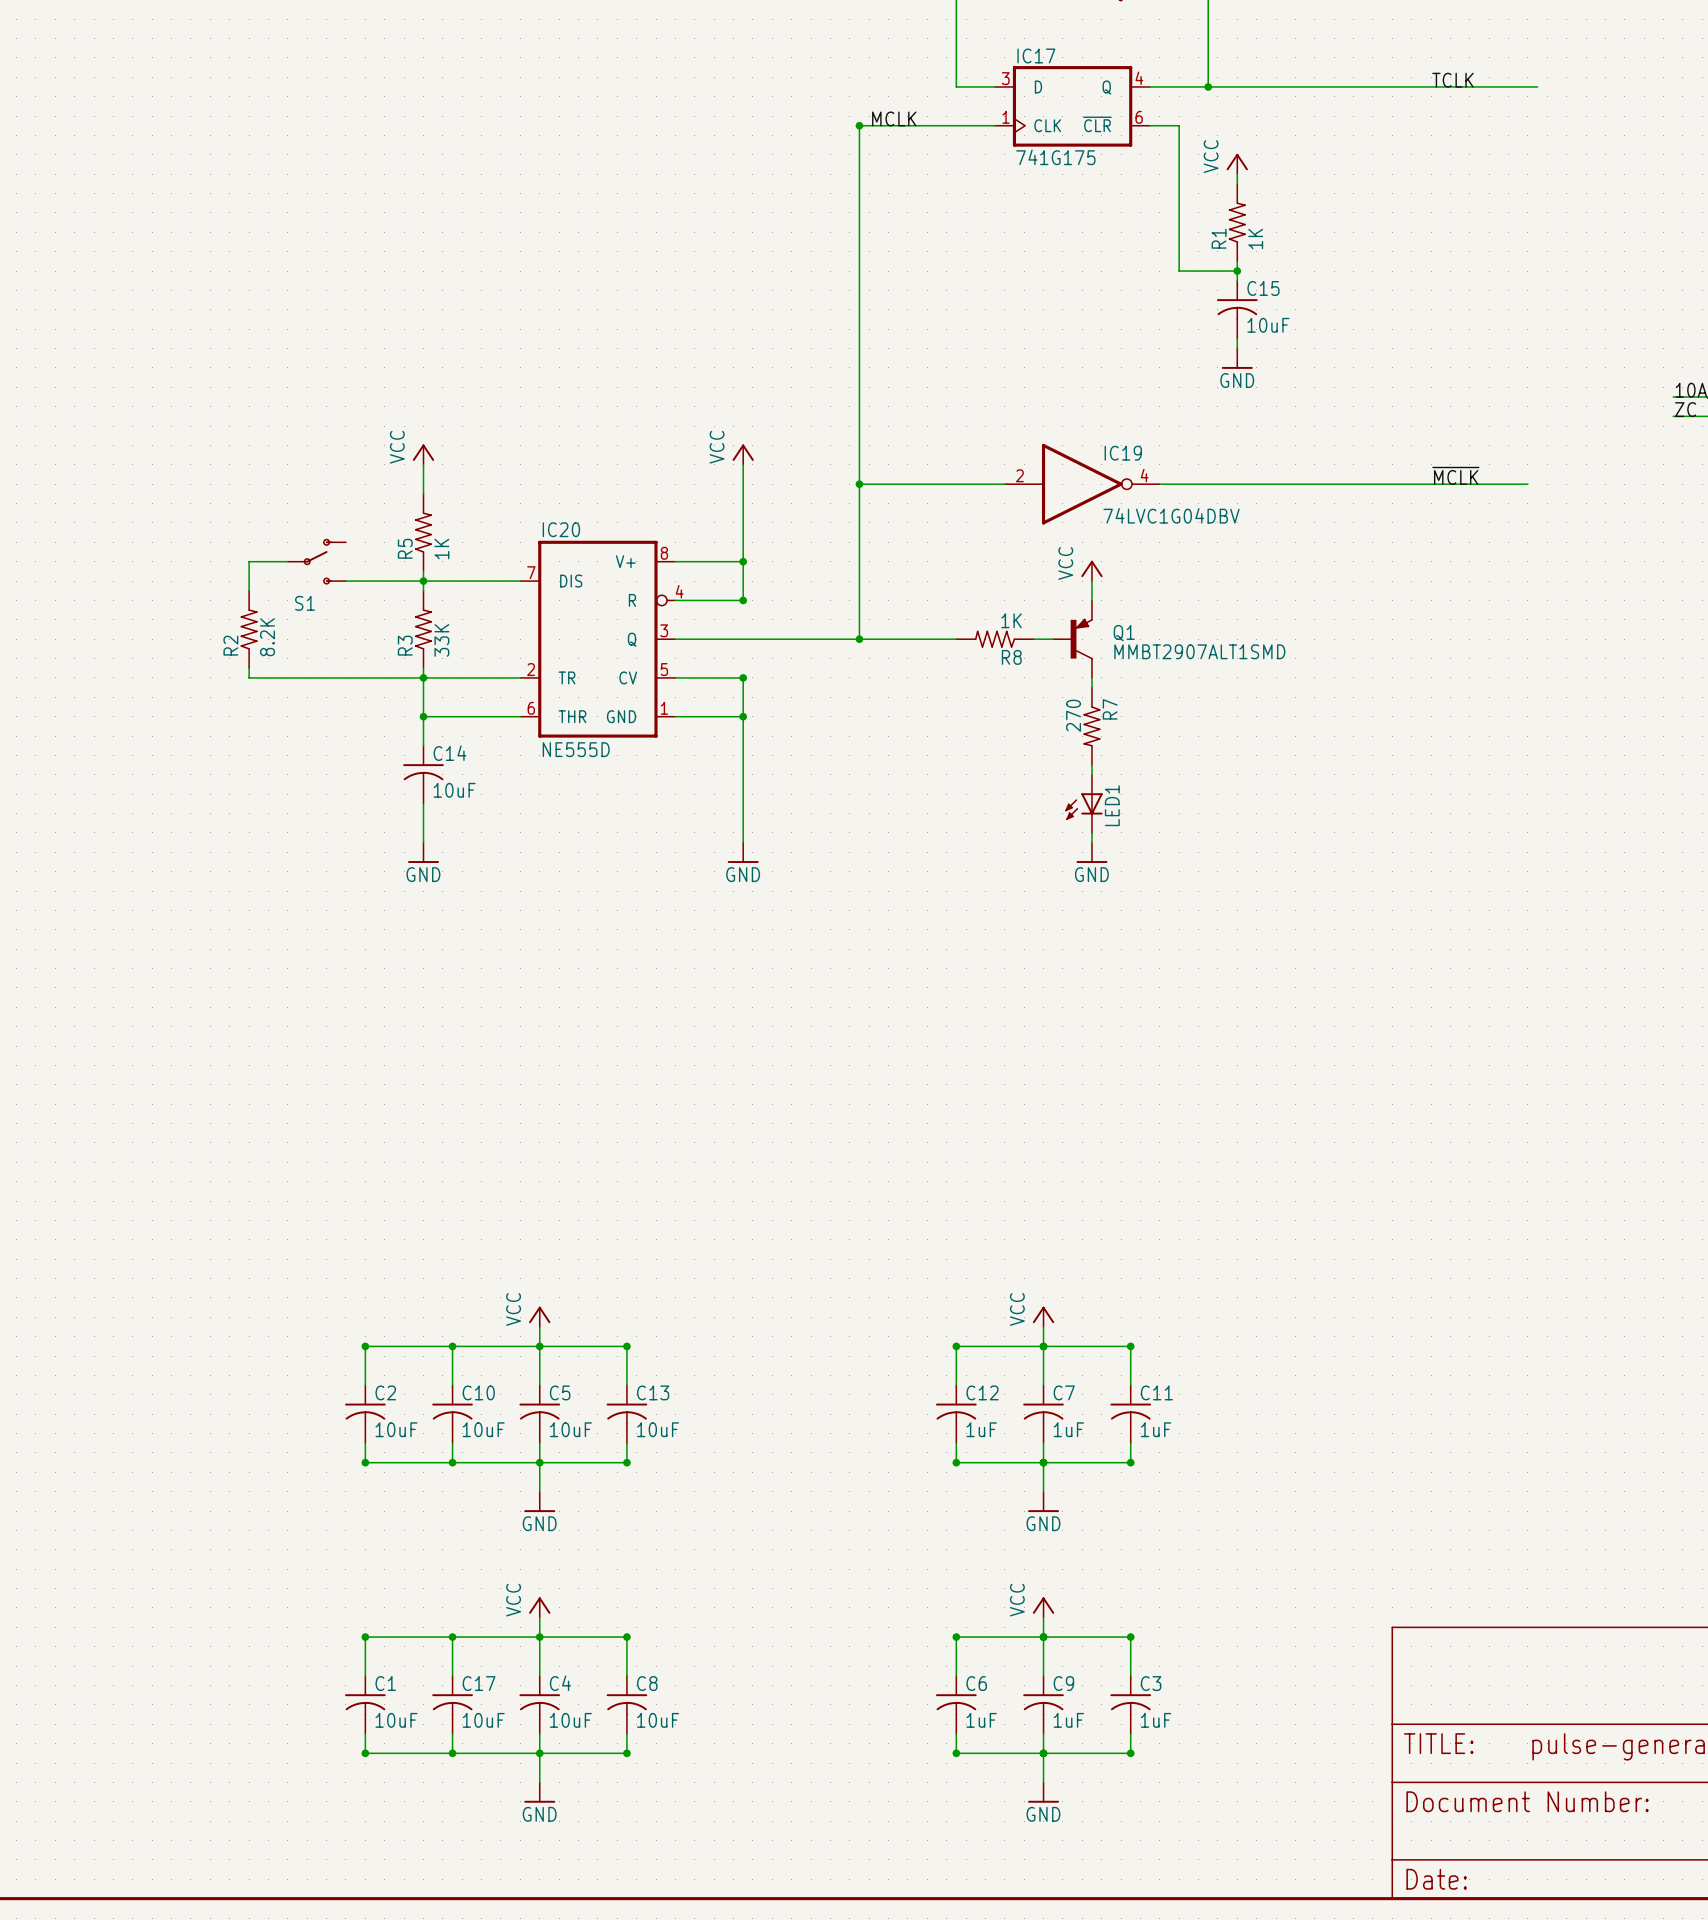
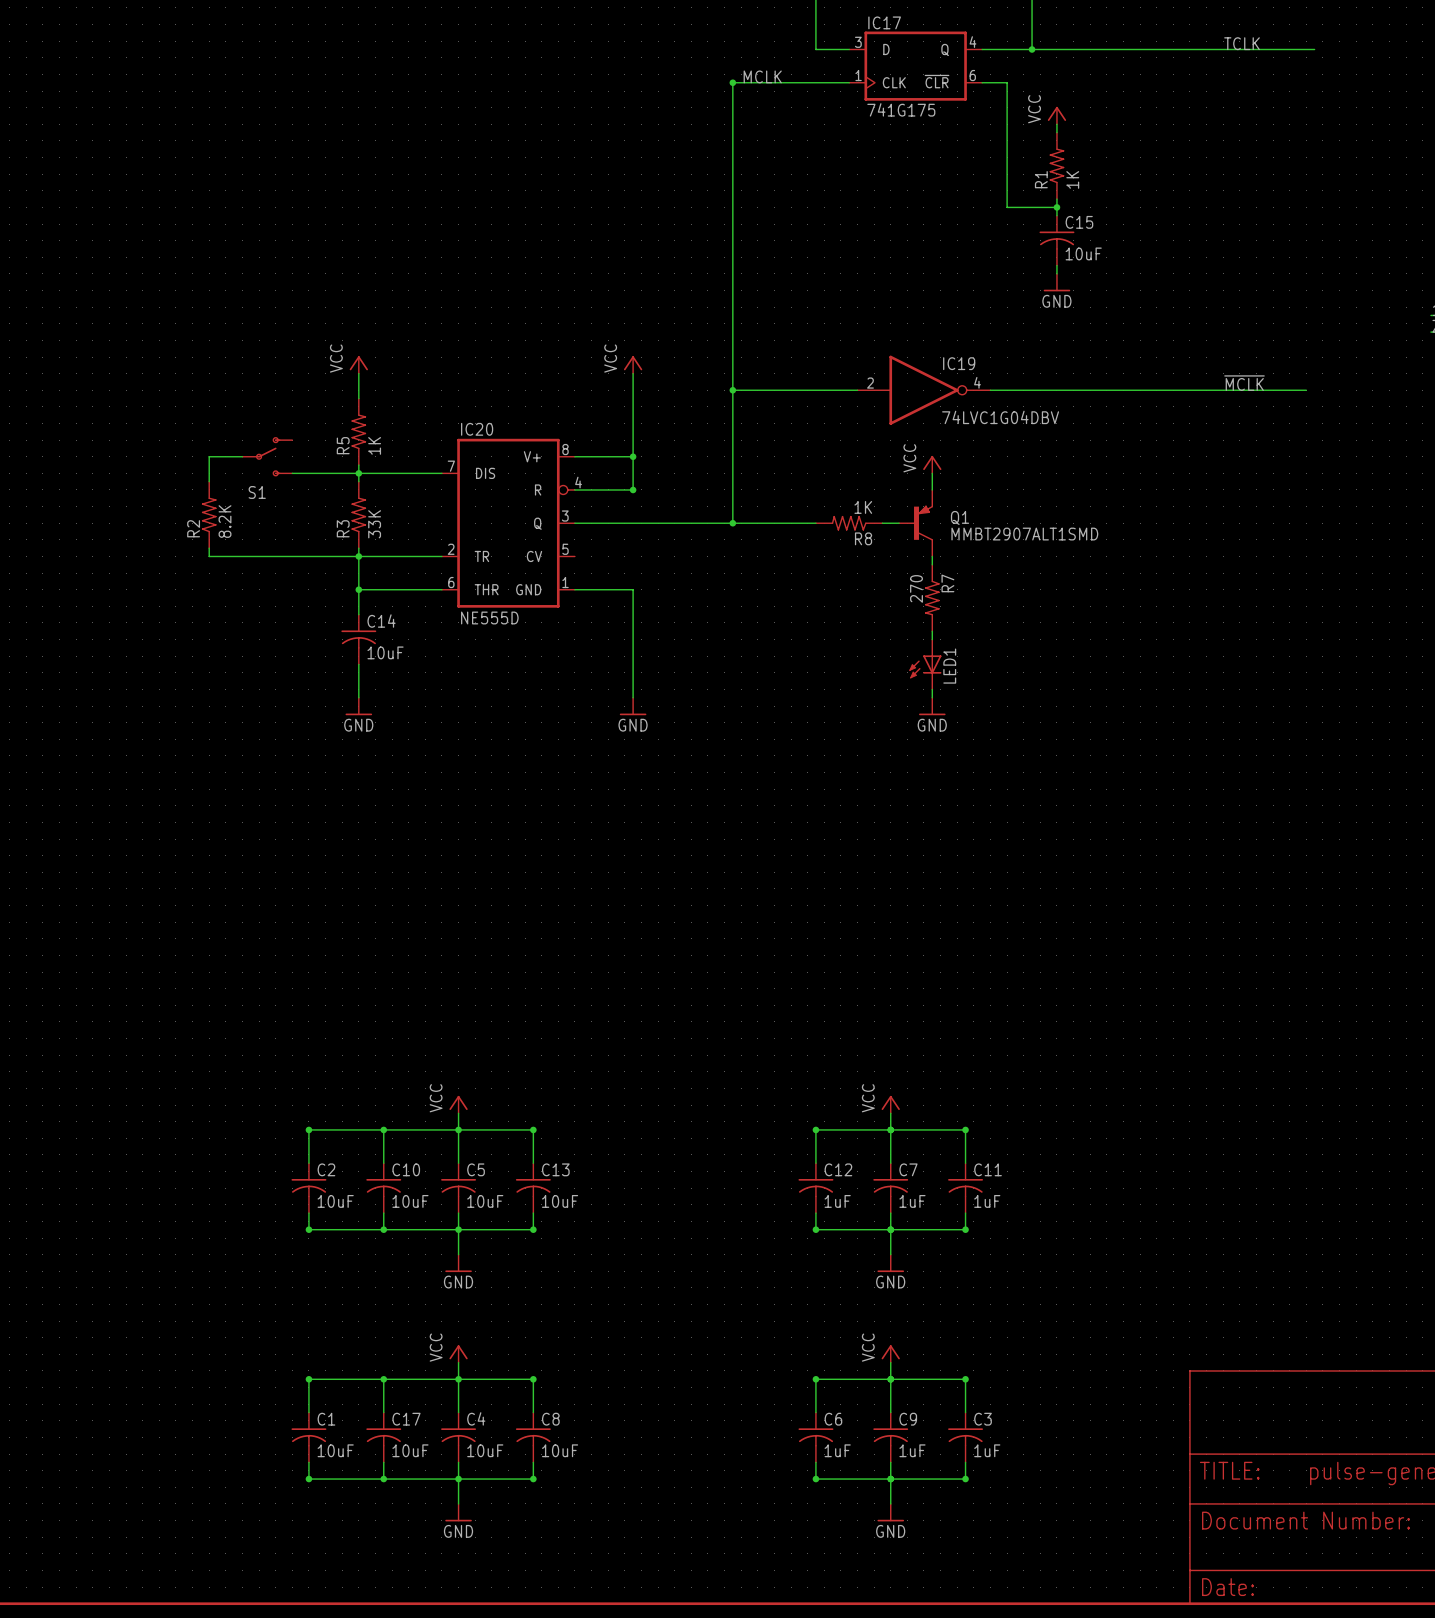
wire: (675, 677) (743, 677) (743, 716) -> none
junction: (743, 677) -> none
junction: (743, 716) -> none

